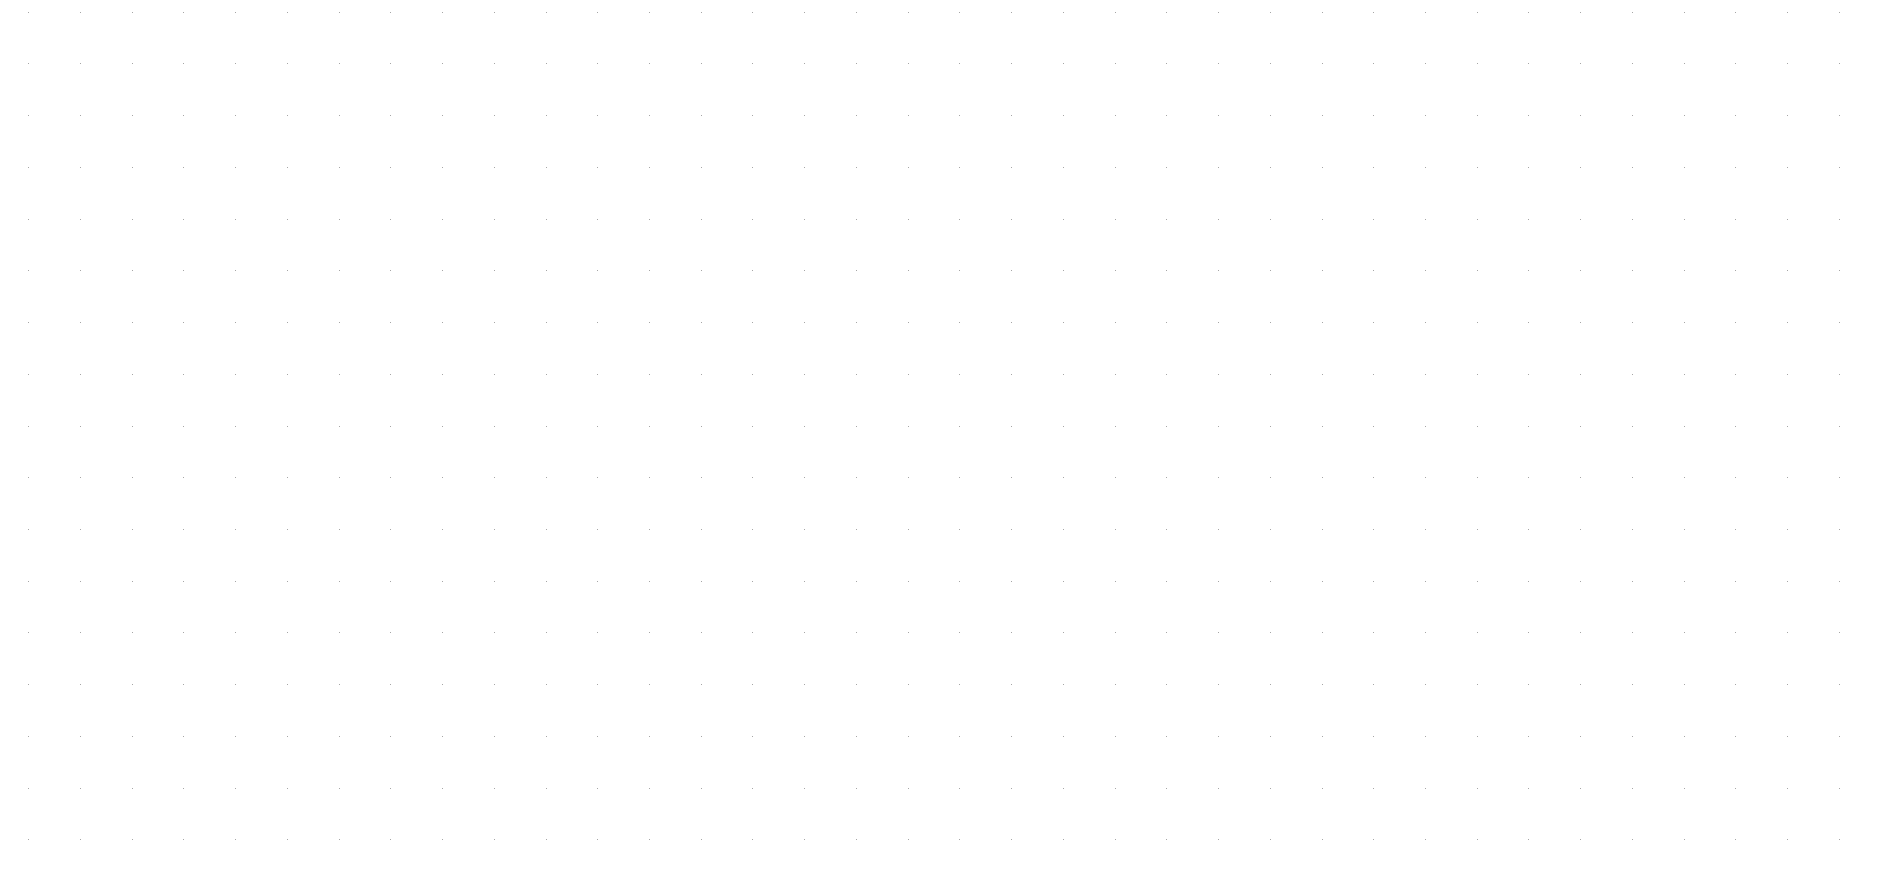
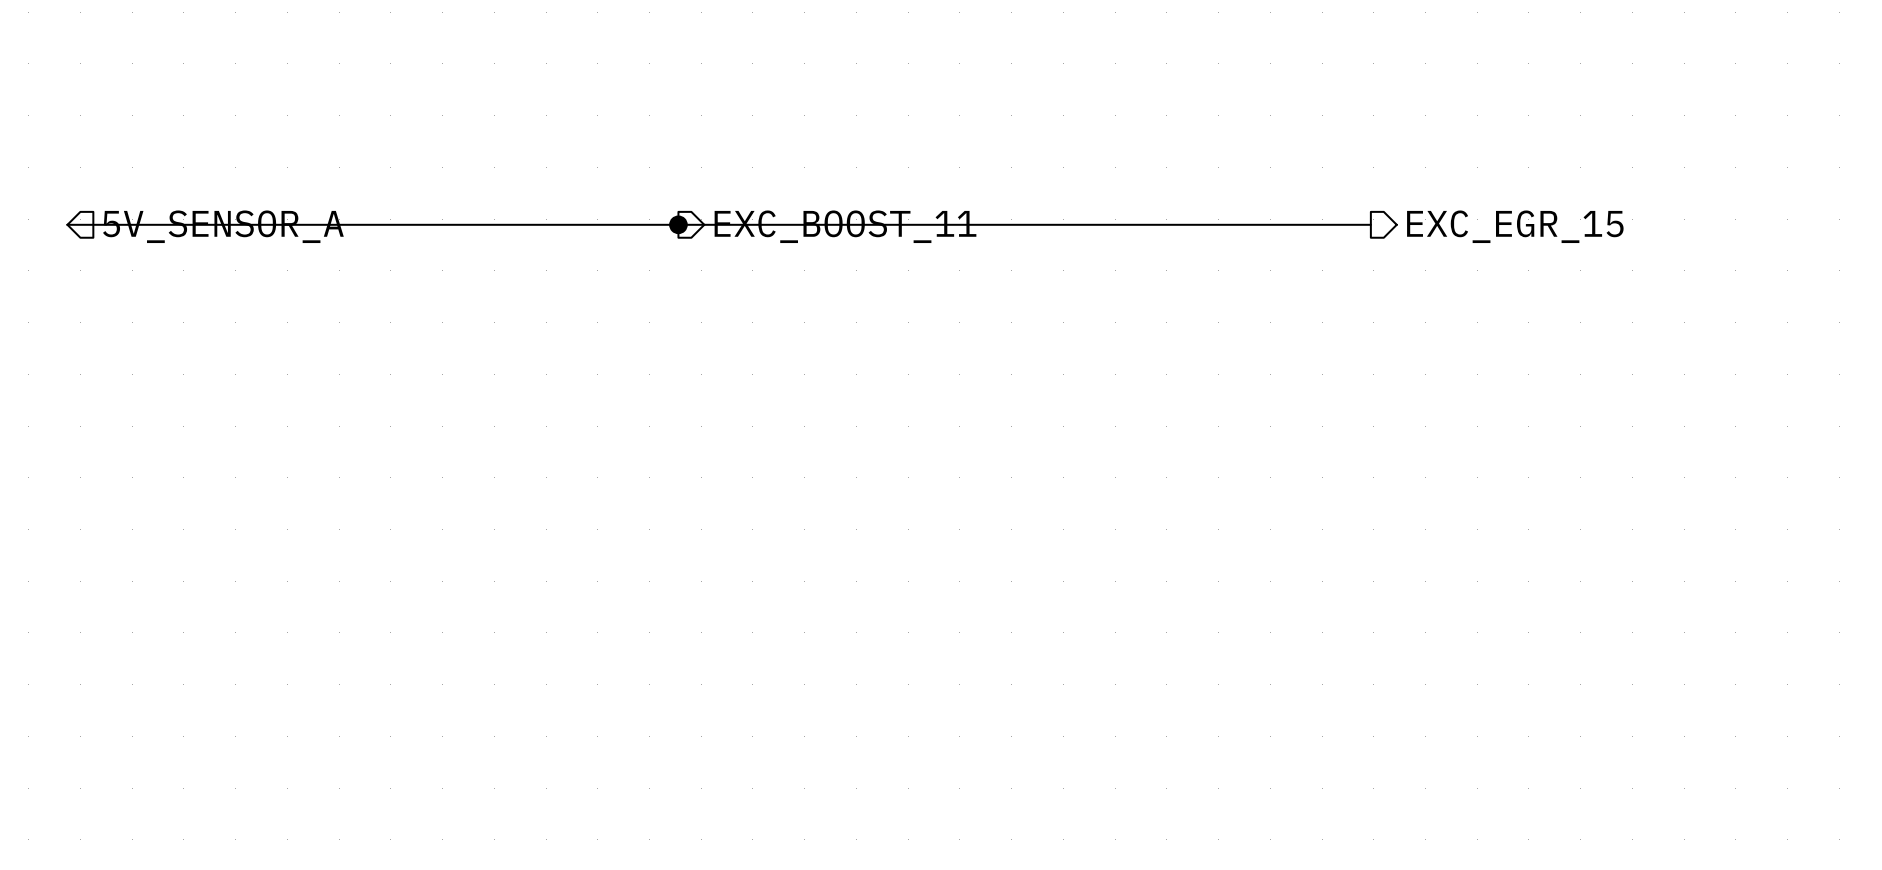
wire: none -> (67, 224) (1370, 224)
junction: none -> (678, 224)
hierarchical label: none -> 5V_SENSOR_A (223, 226)
hierarchical label: none -> EXC_BOOST_11 (845, 226)
hierarchical label: none -> EXC_EGR_15 (1515, 226)

